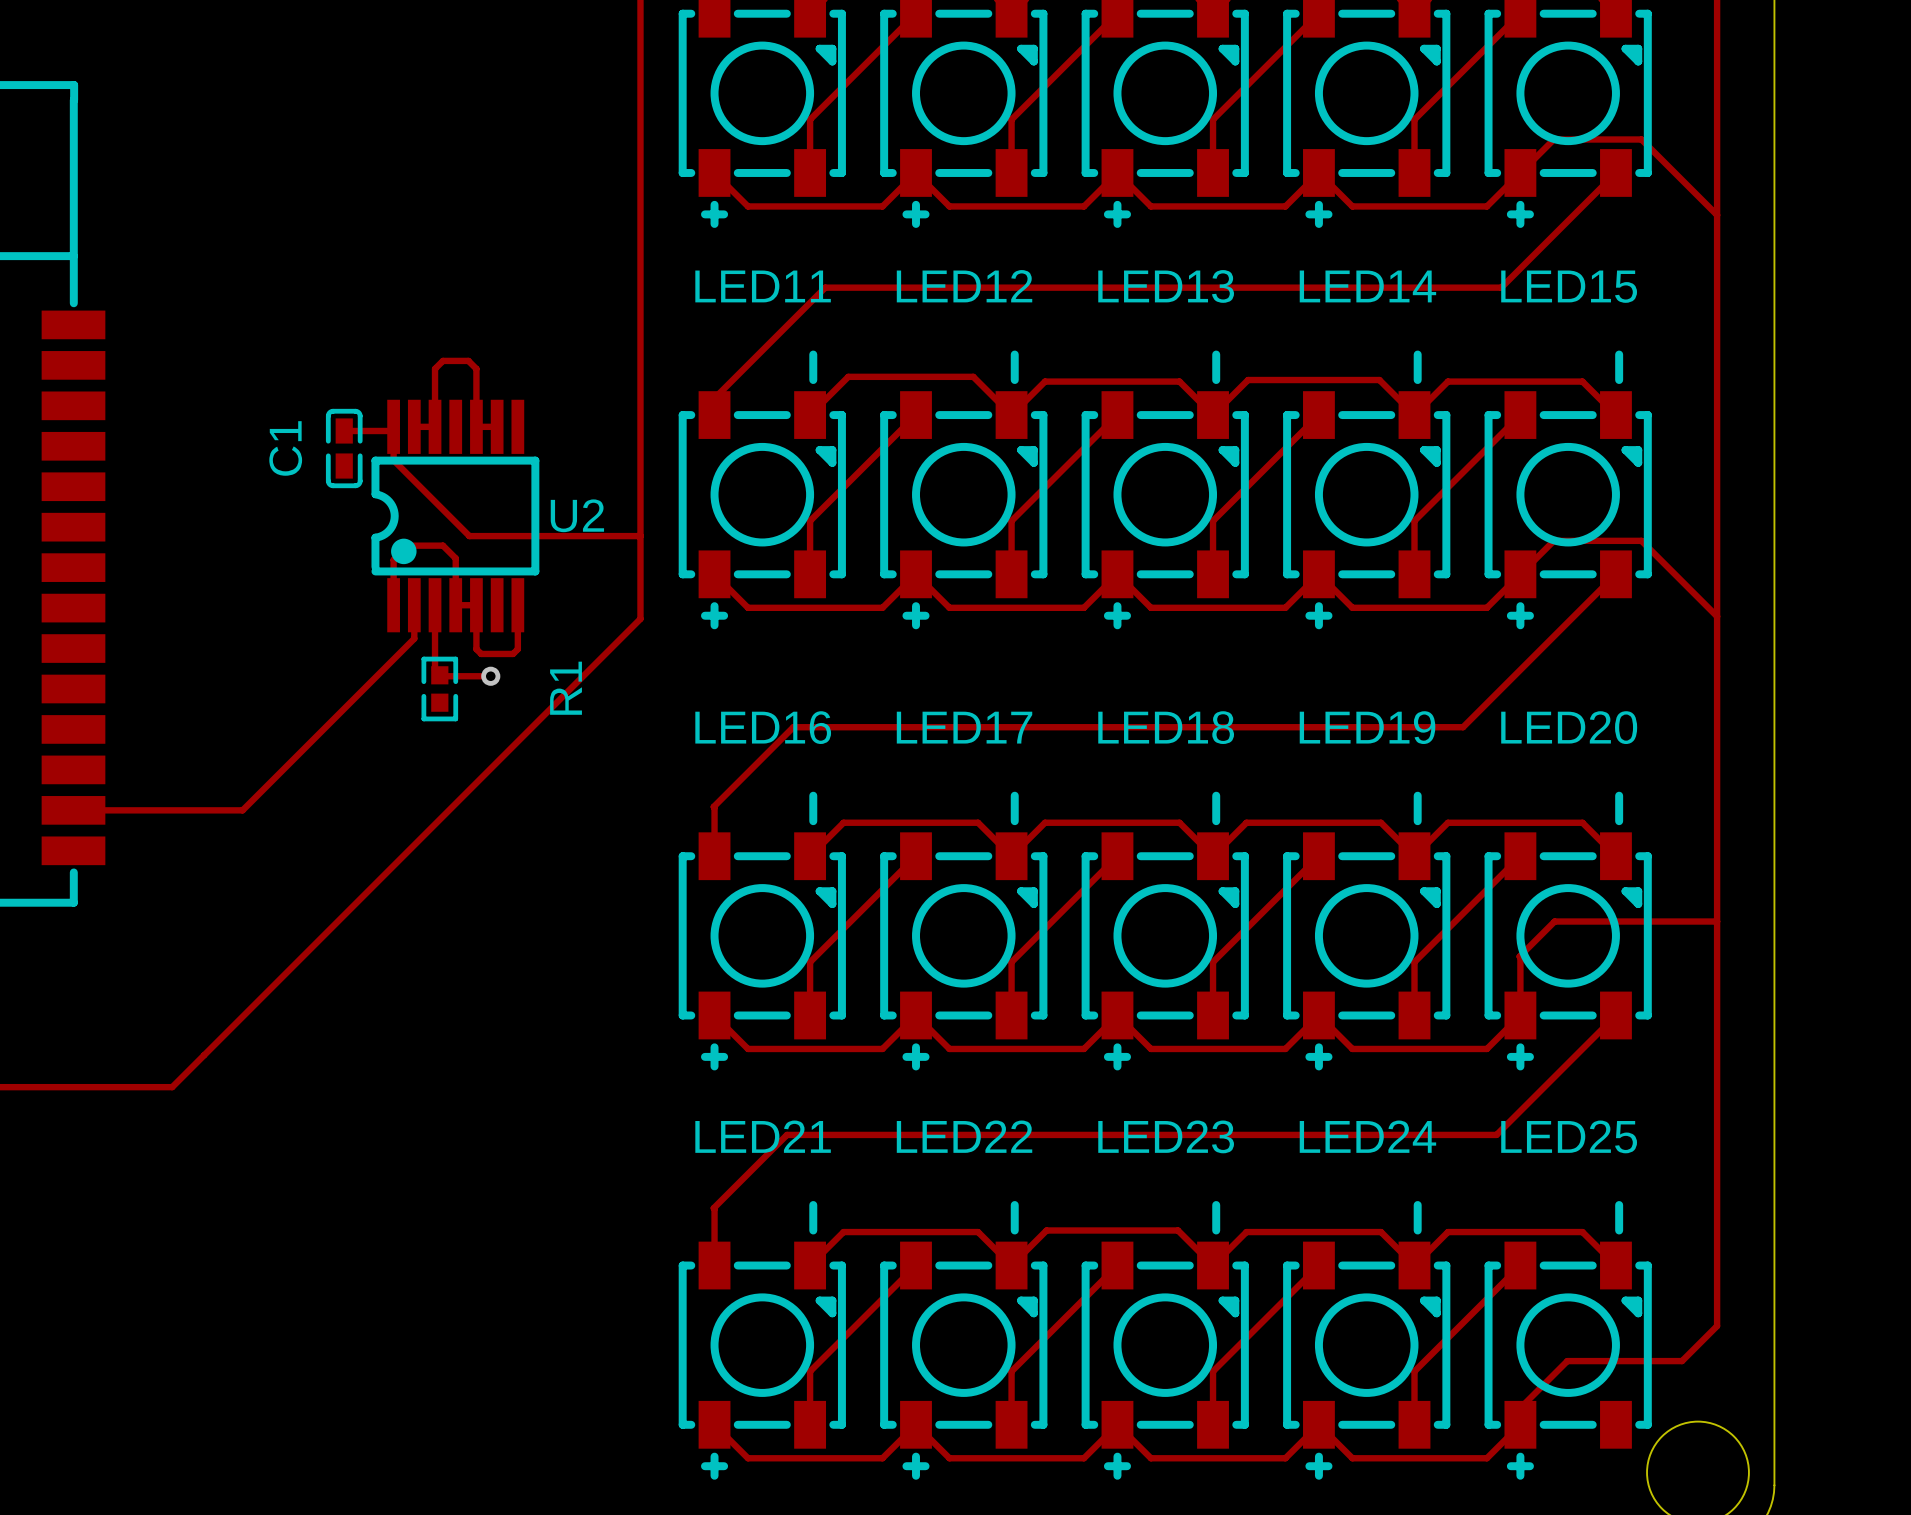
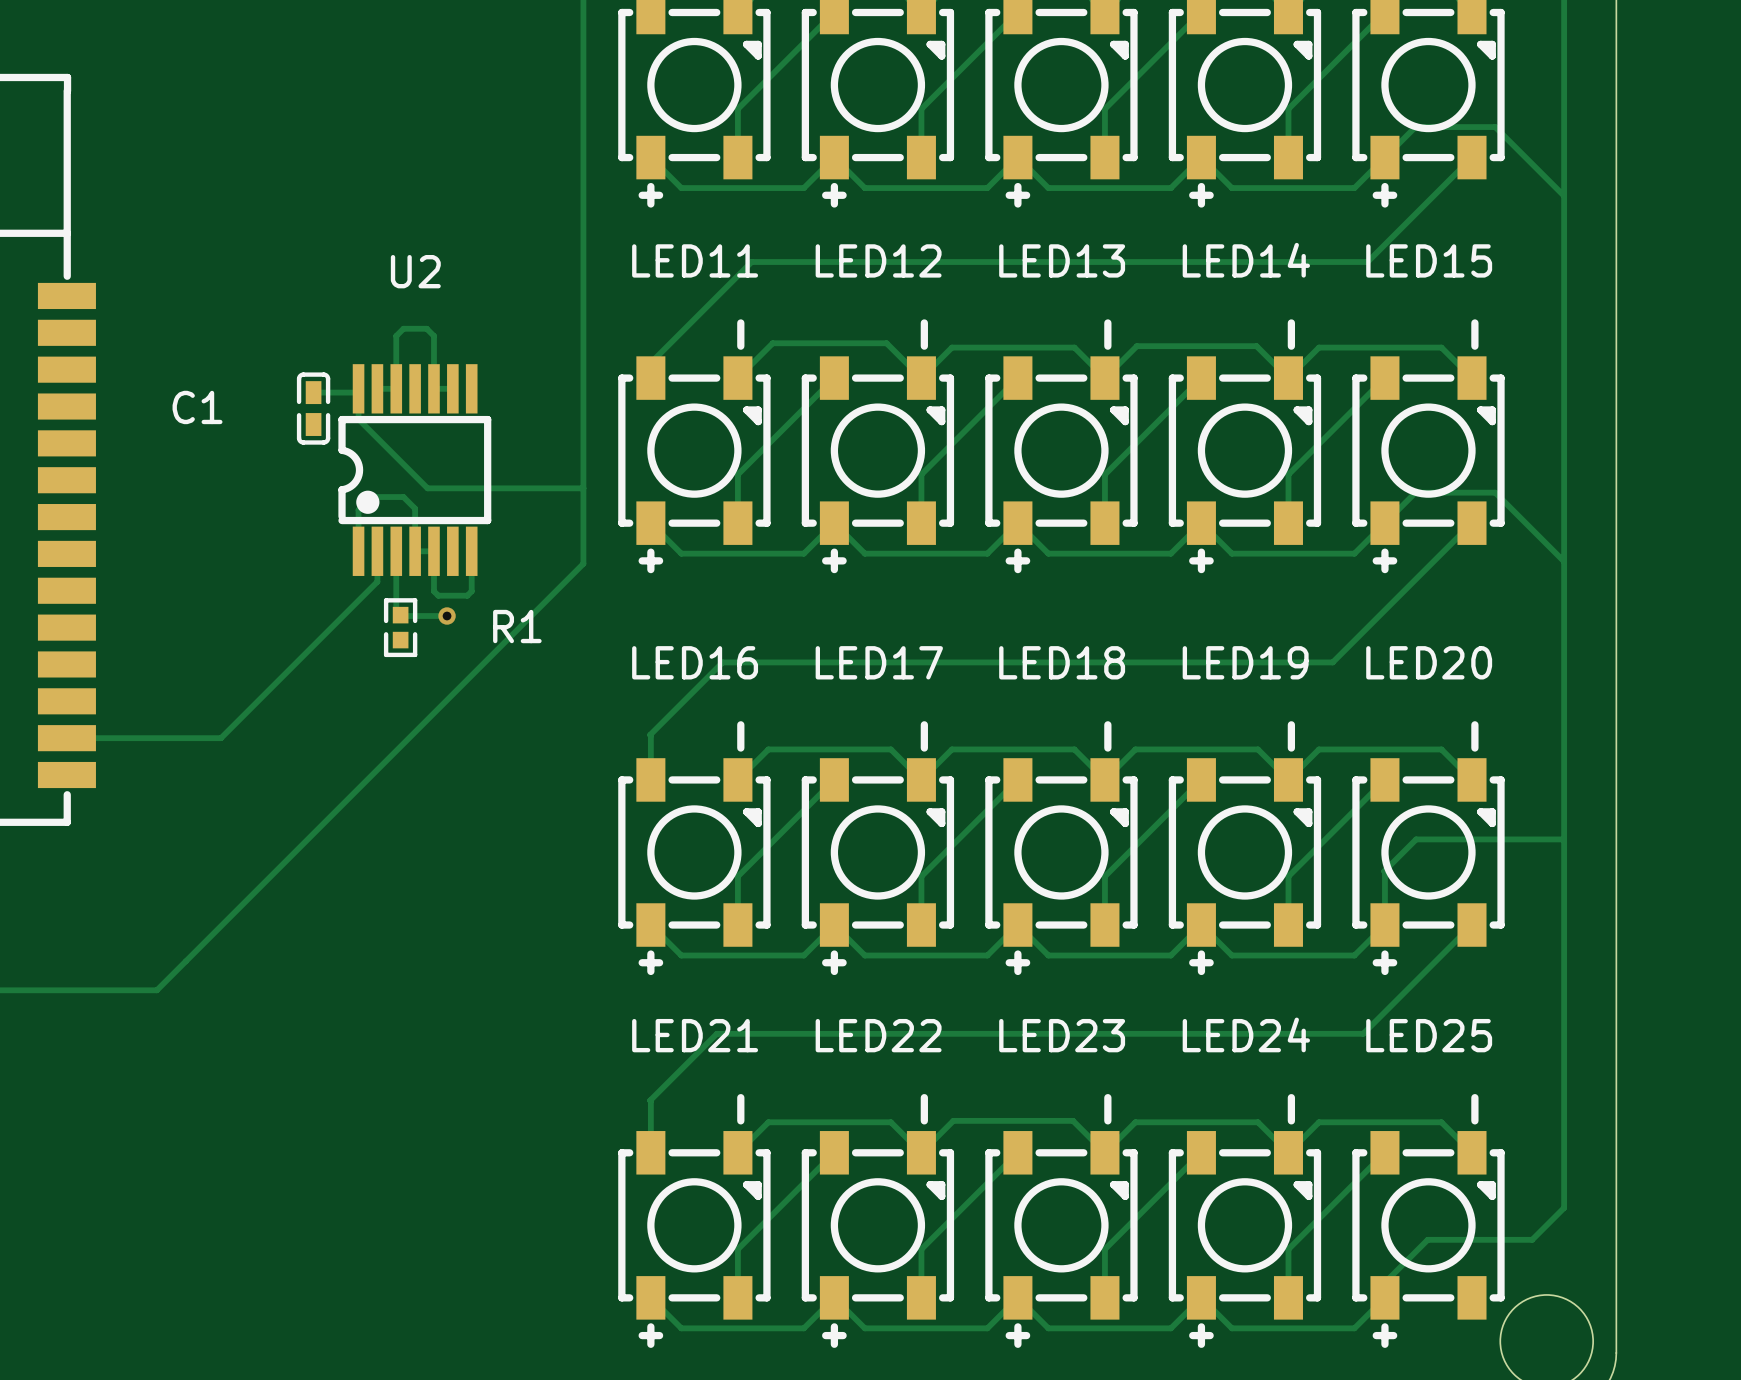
C1 name rotation: 0° (285, 448) -> 90° clockwise (197, 407)
U2 name position: U2 (577, 515) -> U2 (415, 271)
R1 name rotation: 0° (566, 688) -> 90° clockwise (517, 626)

